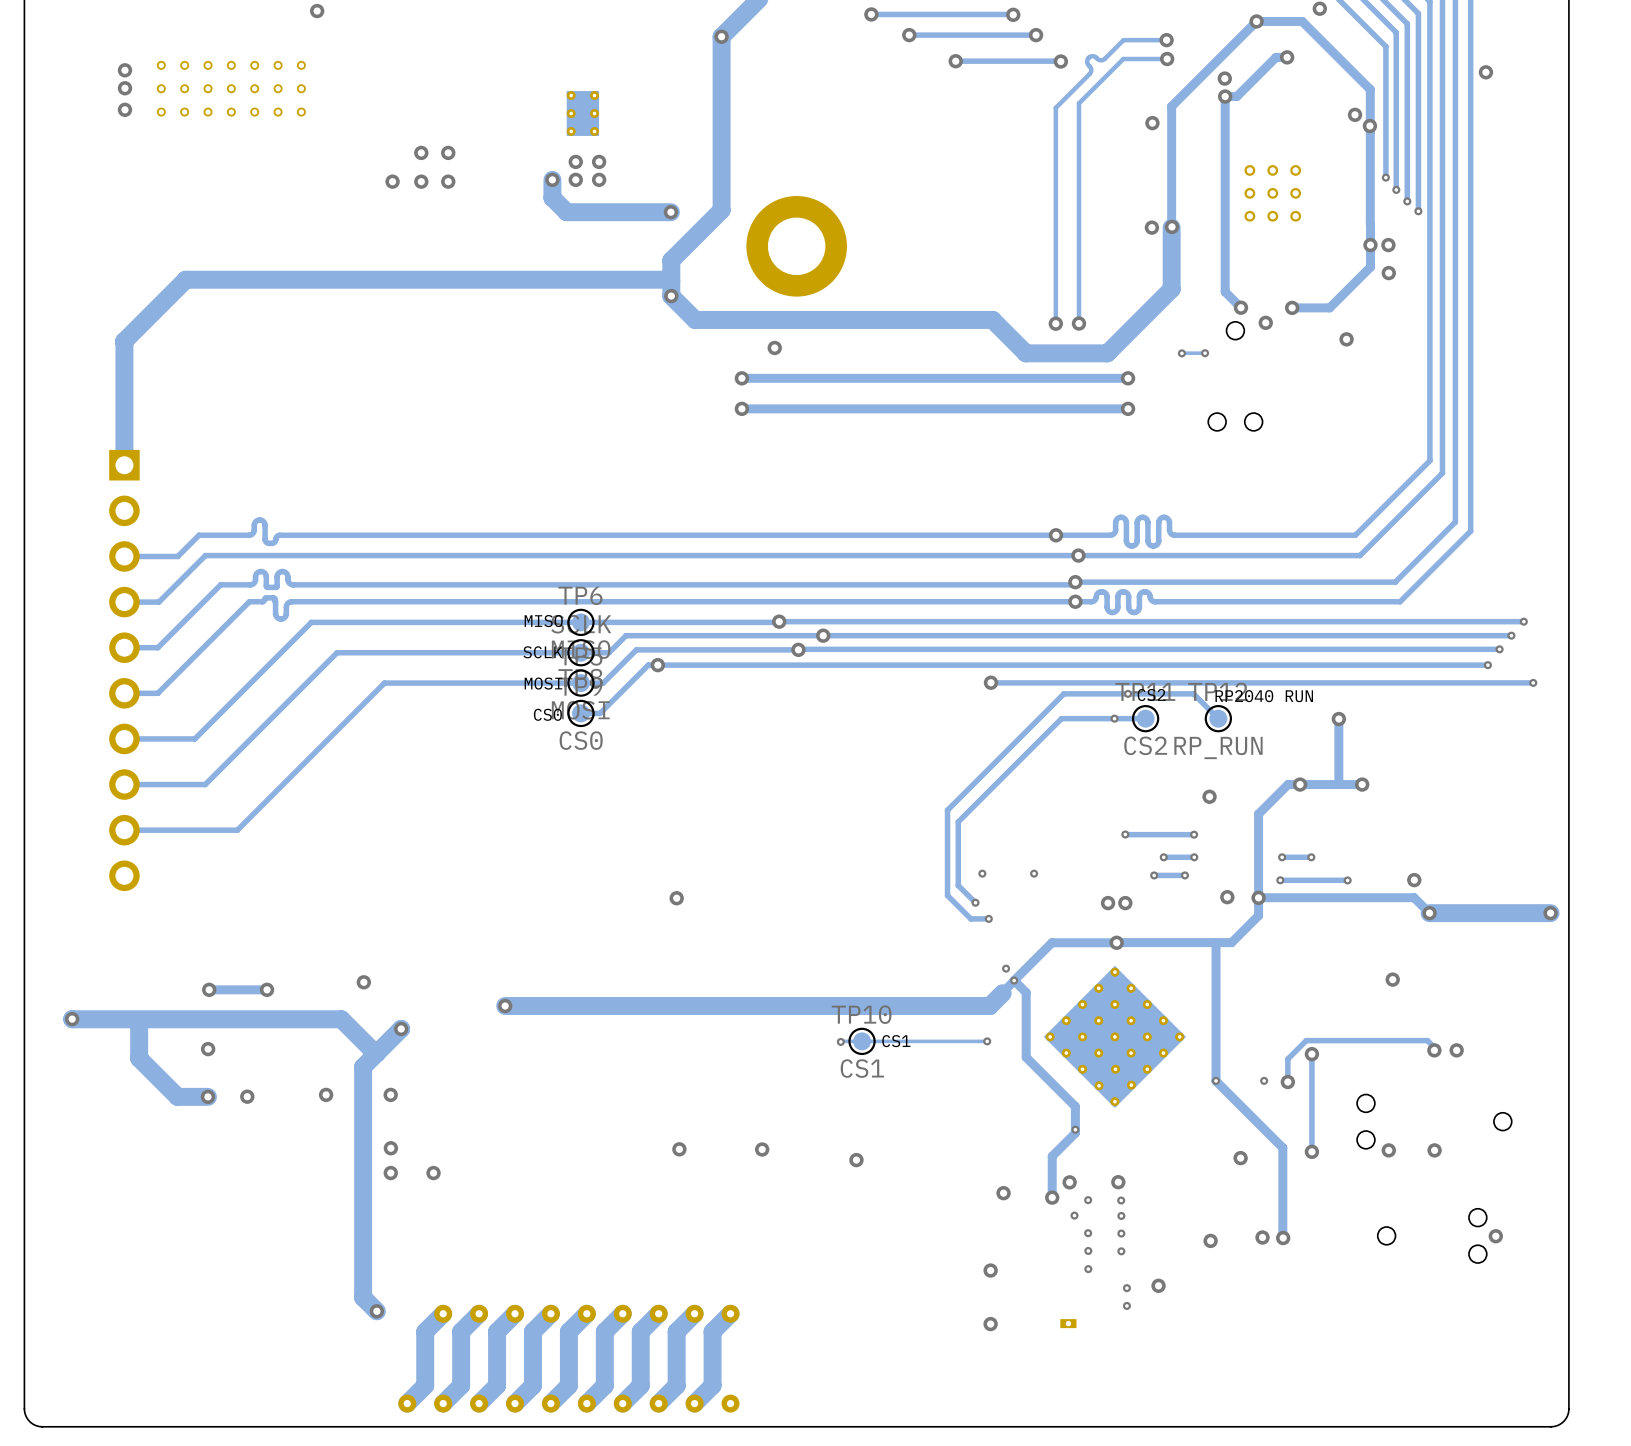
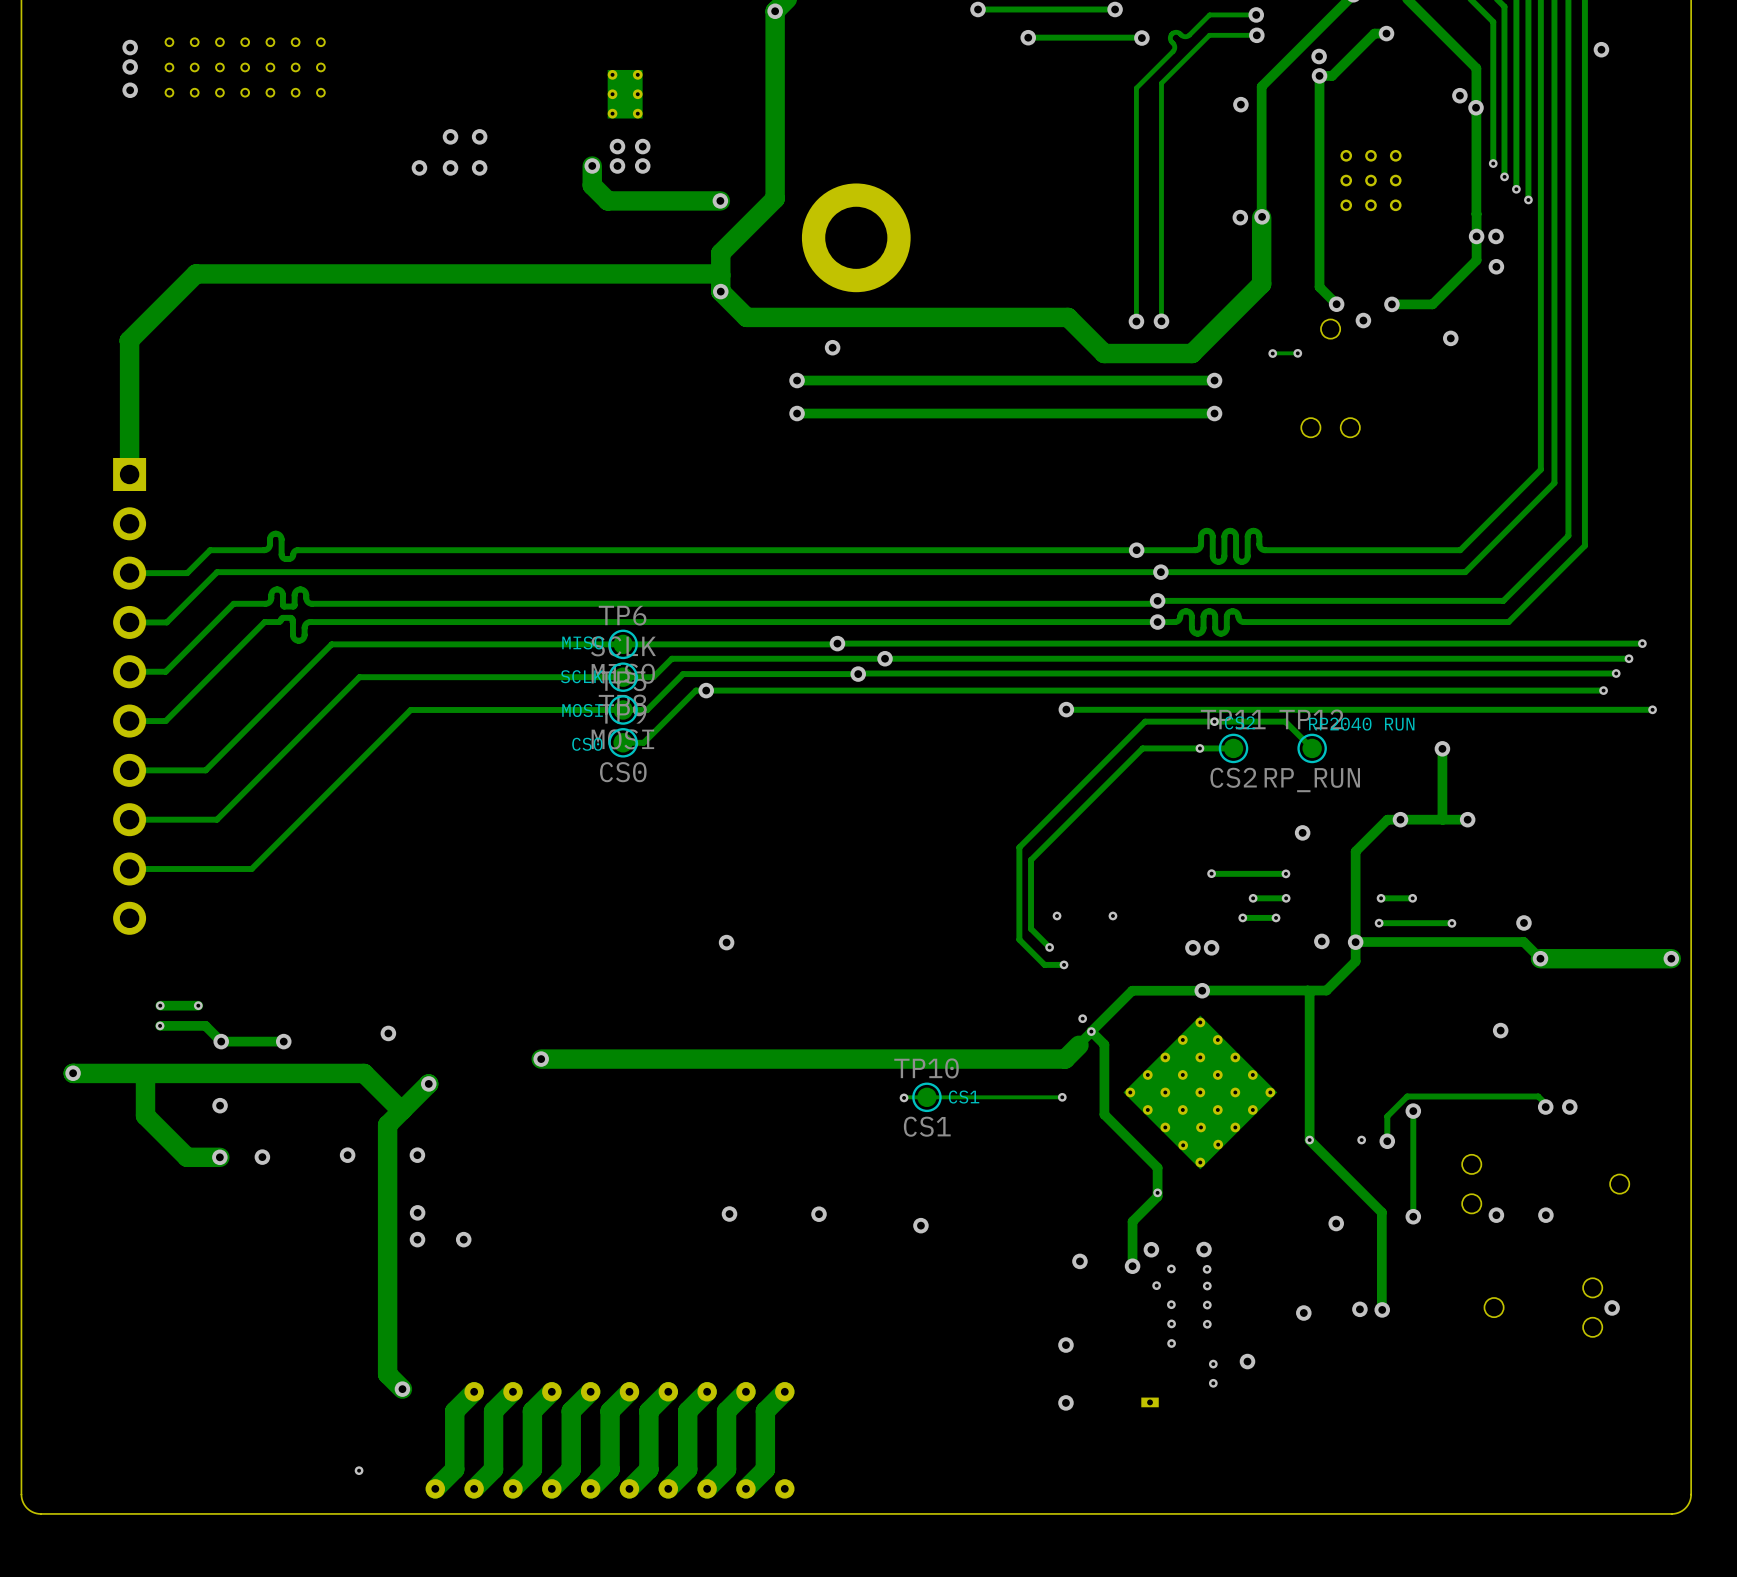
via: none -> (160, 1005)
track: none -> (198, 1005) (160, 1005)
via: none -> (198, 1005)
track: none -> (160, 1025) (205, 1025) (221, 1041)
via: none -> (160, 1025)
via: none -> (359, 1470)

